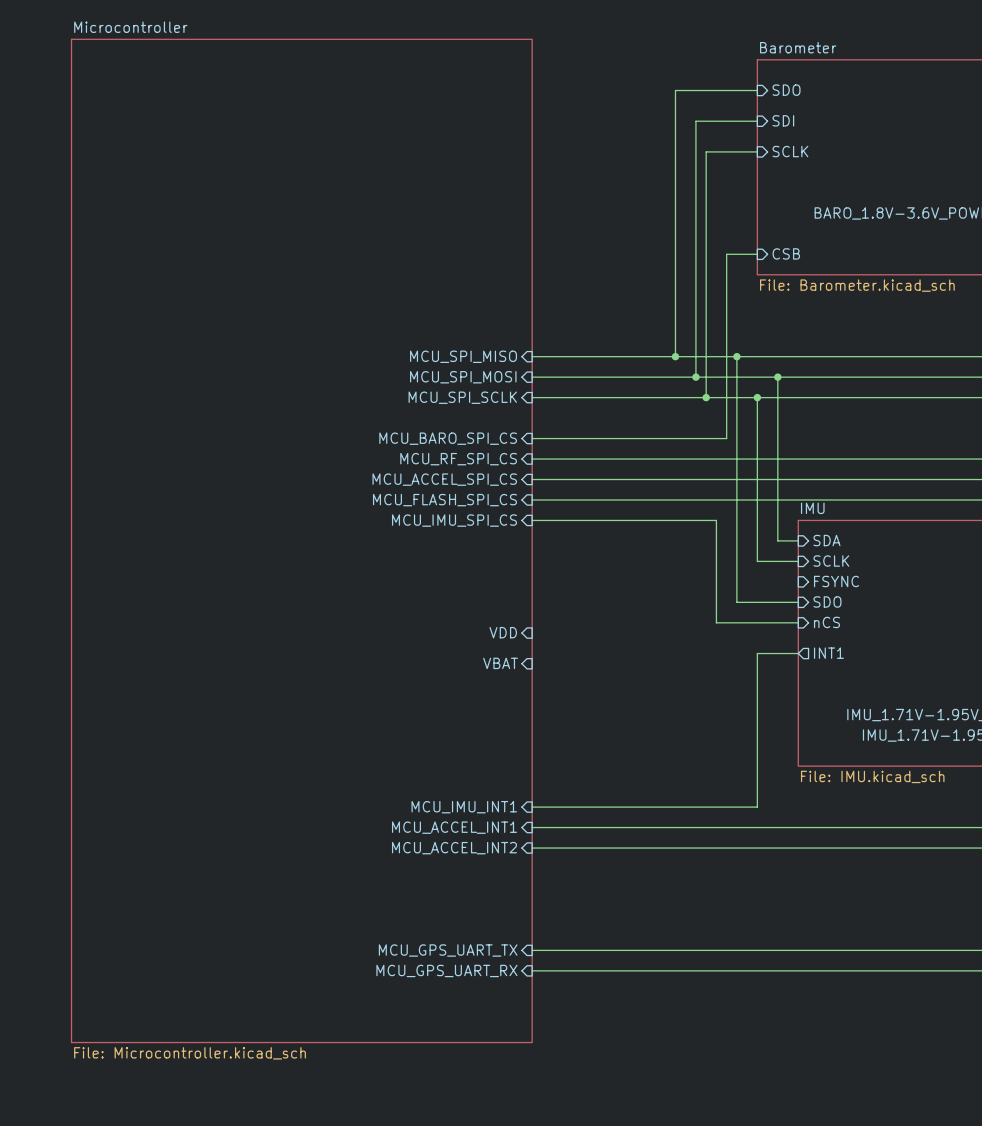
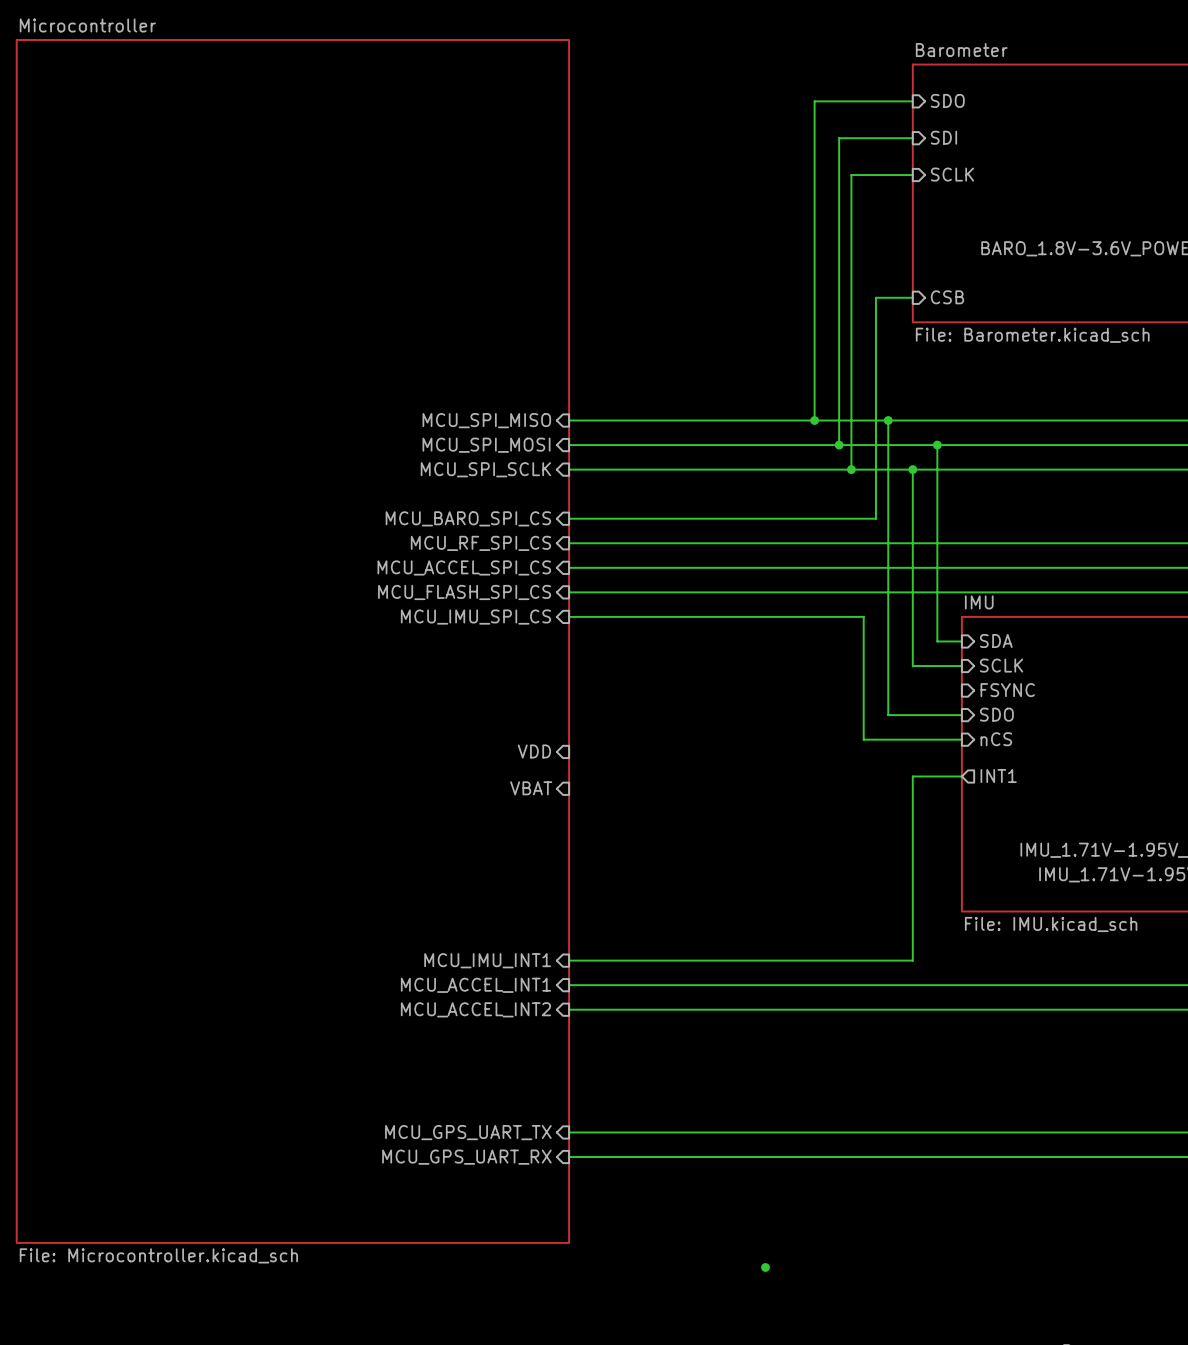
sheet pin position: MCU_SPI_MISO (463, 356) -> MCU_SPI_MISO (486, 420)
wire: none -> (569, 420) (642, 420)
sheet pin position: MCU_SPI_MOSI (463, 377) -> MCU_SPI_MOSI (486, 445)
wire: none -> (569, 445) (642, 445)
sheet pin position: MCU_SPI_SCLK (462, 397) -> MCU_SPI_SCLK (485, 469)
wire: none -> (569, 469) (642, 469)
sheet pin position: MCU_BARO_SPI_CS (448, 438) -> MCU_BARO_SPI_CS (468, 518)
wire: none -> (569, 518) (642, 518)
sheet pin position: MCU_RF_SPI_CS (458, 459) -> MCU_RF_SPI_CS (480, 543)
wire: none -> (569, 543) (642, 543)
sheet pin position: MCU_ACCEL_SPI_CS (444, 479) -> MCU_ACCEL_SPI_CS (464, 567)
wire: none -> (569, 567) (642, 567)
wire: none -> (569, 592) (642, 592)
sheet pin position: MCU_FLASH_SPI_CS (444, 500) -> MCU_FLASH_SPI_CS (464, 592)
sheet pin position: MCU_IMU_SPI_CS (454, 520) -> MCU_IMU_SPI_CS (475, 617)
wire: none -> (569, 616) (642, 616)
sheet Microcontroller position: (301, 540) -> (292, 641)
sheet pin position: VDD (503, 632) -> VDD (534, 751)
sheet pin position: VBAT (500, 663) -> VBAT (531, 788)
sheet pin position: MCU_IMU_INT1 (464, 807) -> MCU_IMU_INT1 (487, 960)
wire: none -> (569, 960) (642, 960)
sheet pin position: MCU_ACCEL_INT1 (454, 827) -> MCU_ACCEL_INT1 (475, 985)
wire: none -> (569, 985) (642, 985)
sheet pin position: MCU_ACCEL_INT2 (454, 848) -> MCU_ACCEL_INT2 (475, 1009)
wire: none -> (569, 1009) (642, 1009)
sheet pin position: MCU_GPS_UART_TX (448, 950) -> MCU_GPS_UART_TX (468, 1132)
wire: none -> (569, 1132) (642, 1132)
sheet pin position: MCU_GPS_UART_RX (446, 970) -> MCU_GPS_UART_RX (466, 1157)
wire: none -> (569, 1157) (642, 1157)
junction: none -> (765, 1267)

